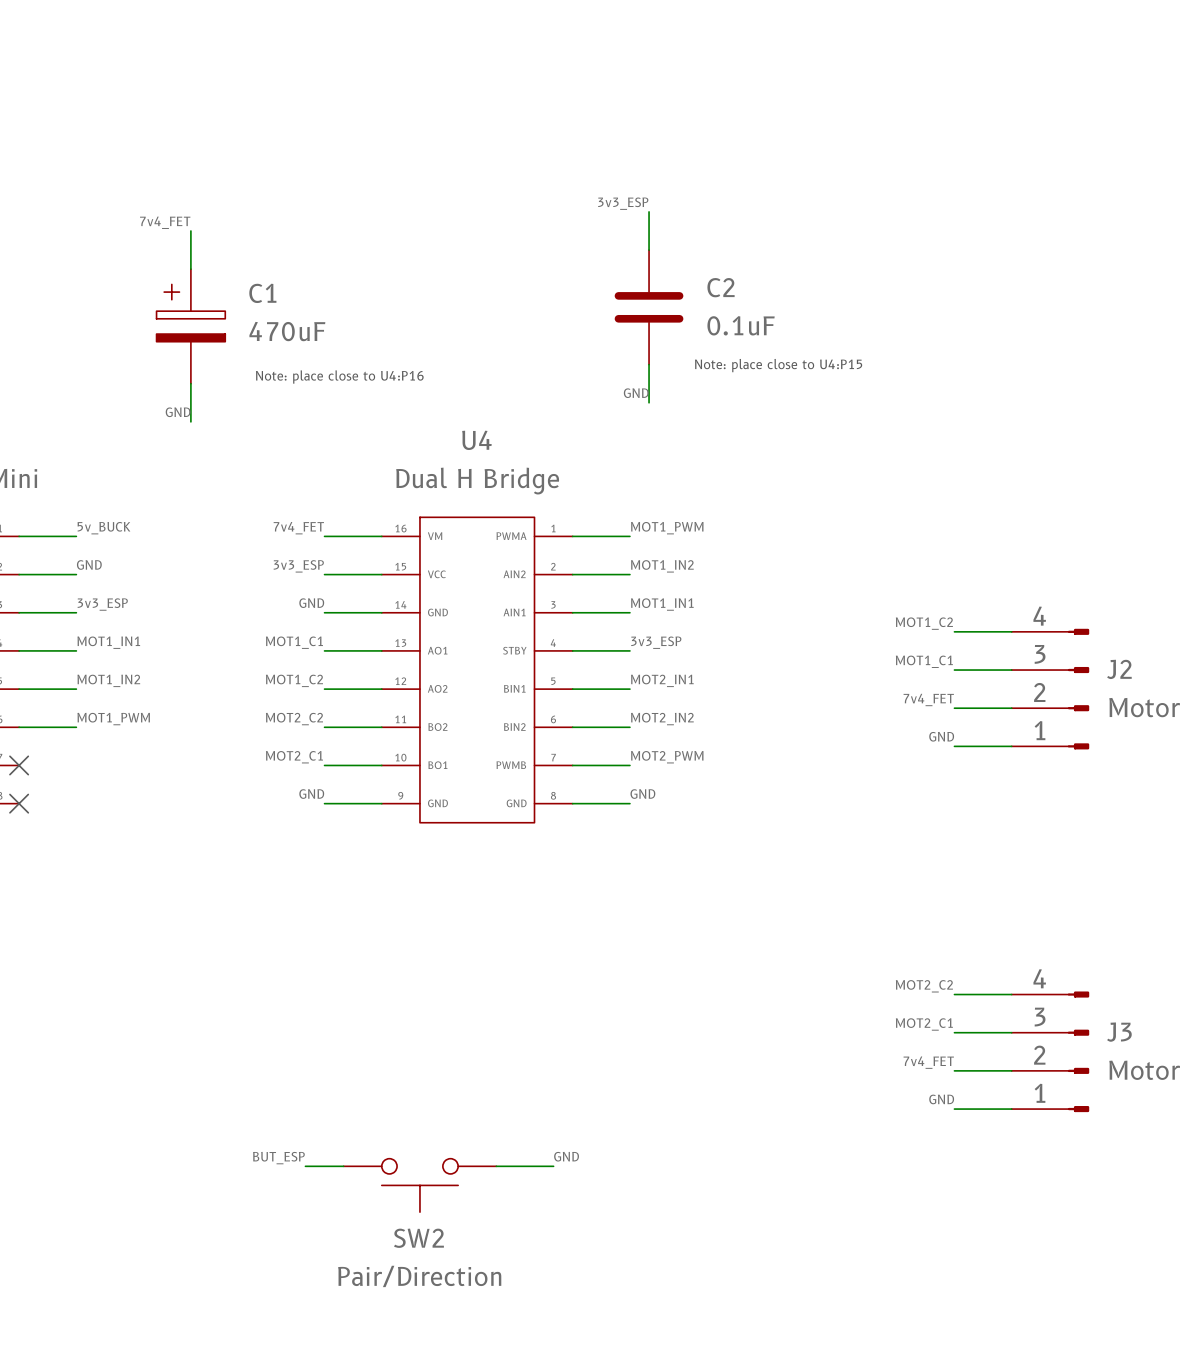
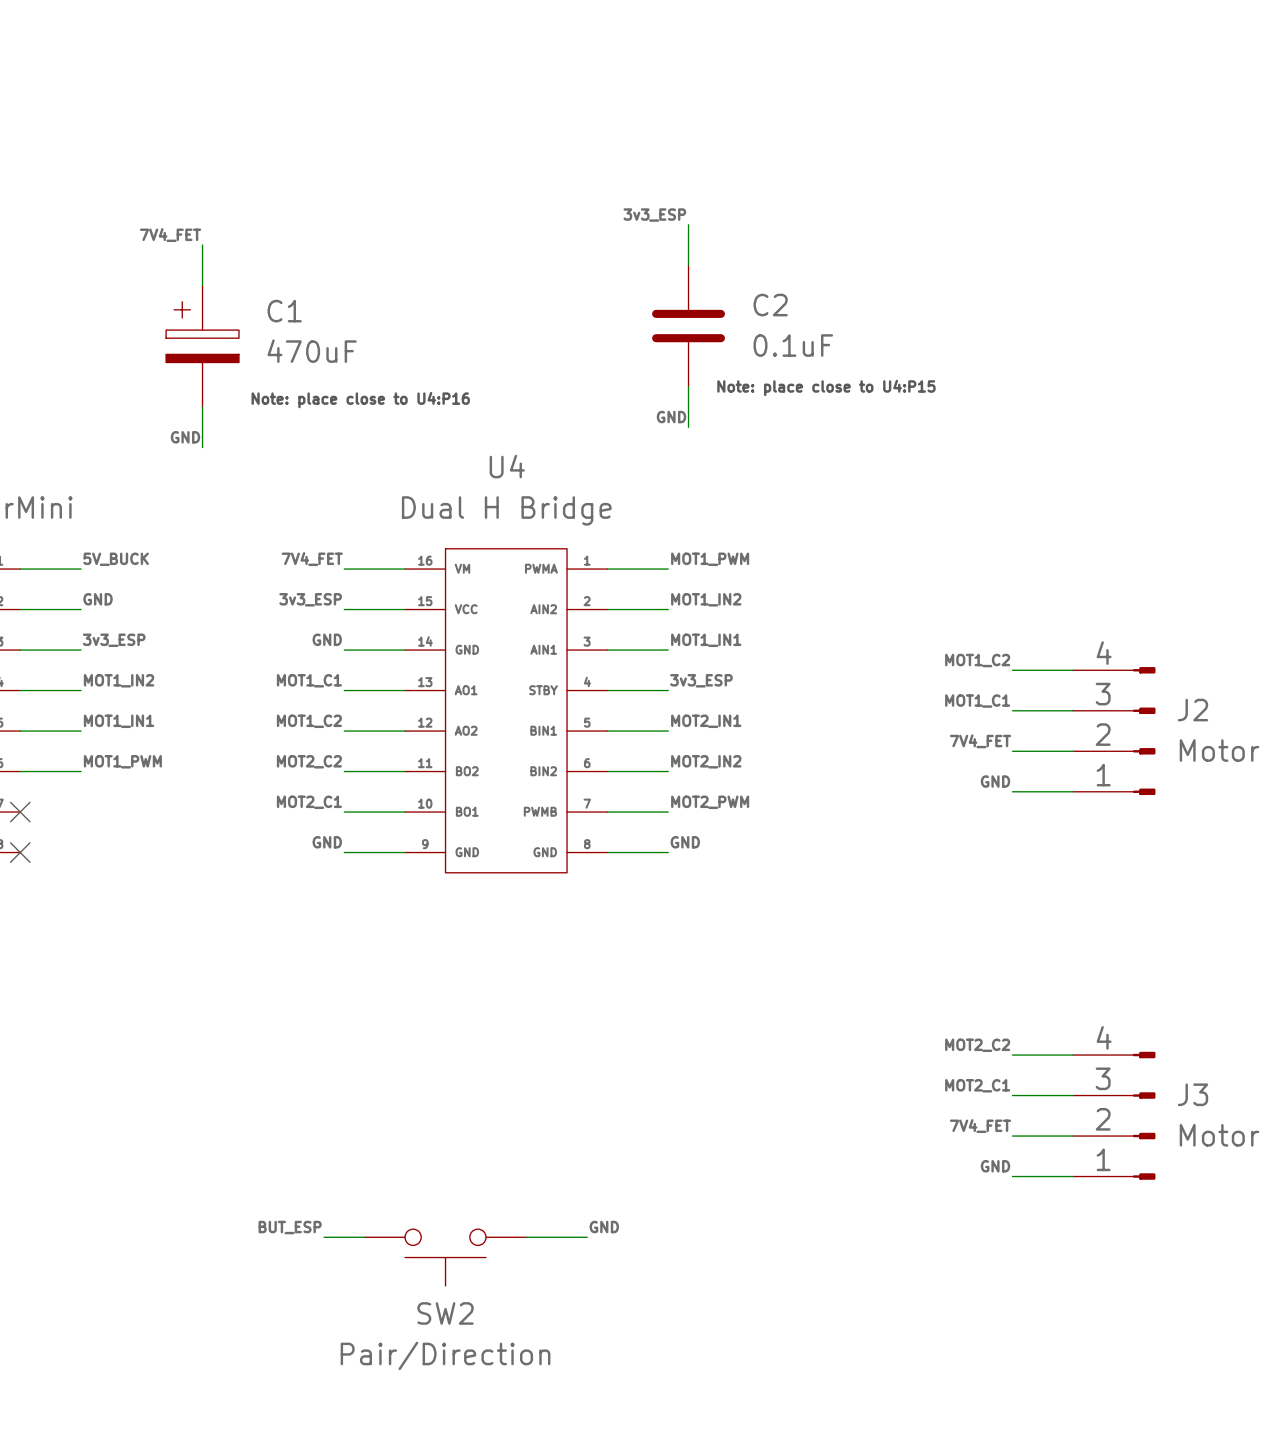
label: 7v4_FET (165, 222) -> 7V4_FET (170, 235)
label: 5v_BUCK (103, 528) -> 5V_BUCK (116, 559)
label: 7v4_FET (298, 528) -> 7V4_FET (312, 559)
label: MOT1_IN1 (108, 642) -> MOT1_IN2 (119, 680)
label: MOT1_IN2 (108, 680) -> MOT1_IN1 (119, 721)
label: 7v4_FET (928, 699) -> 7V4_FET (980, 741)
label: 7v4_FET (928, 1062) -> 7V4_FET (980, 1126)

